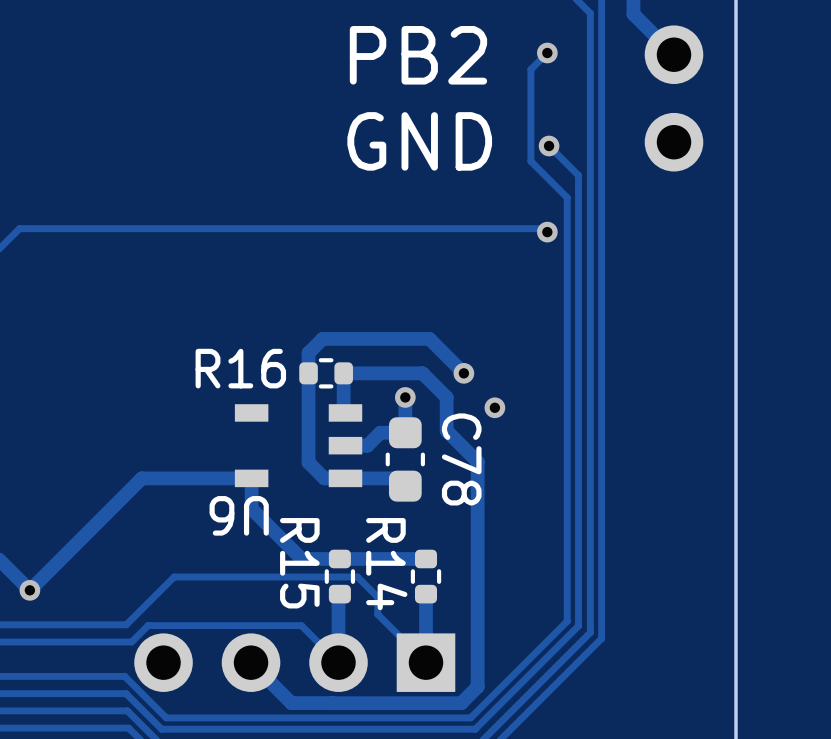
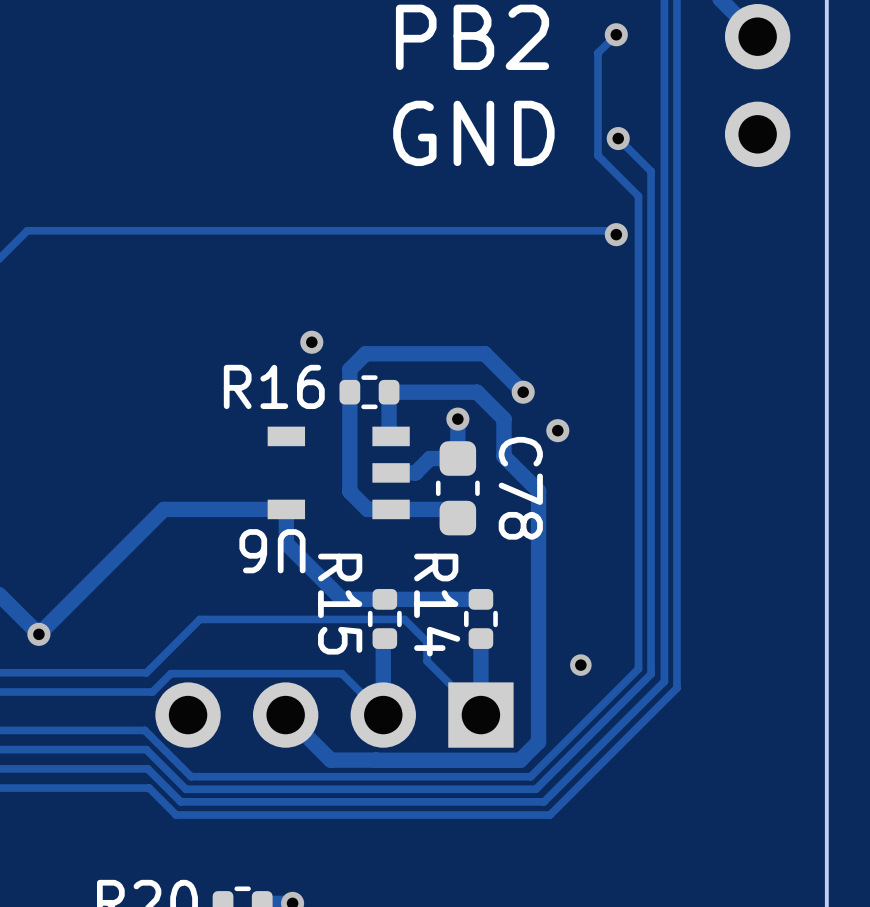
via: none -> (311, 342)
via: none -> (580, 665)

